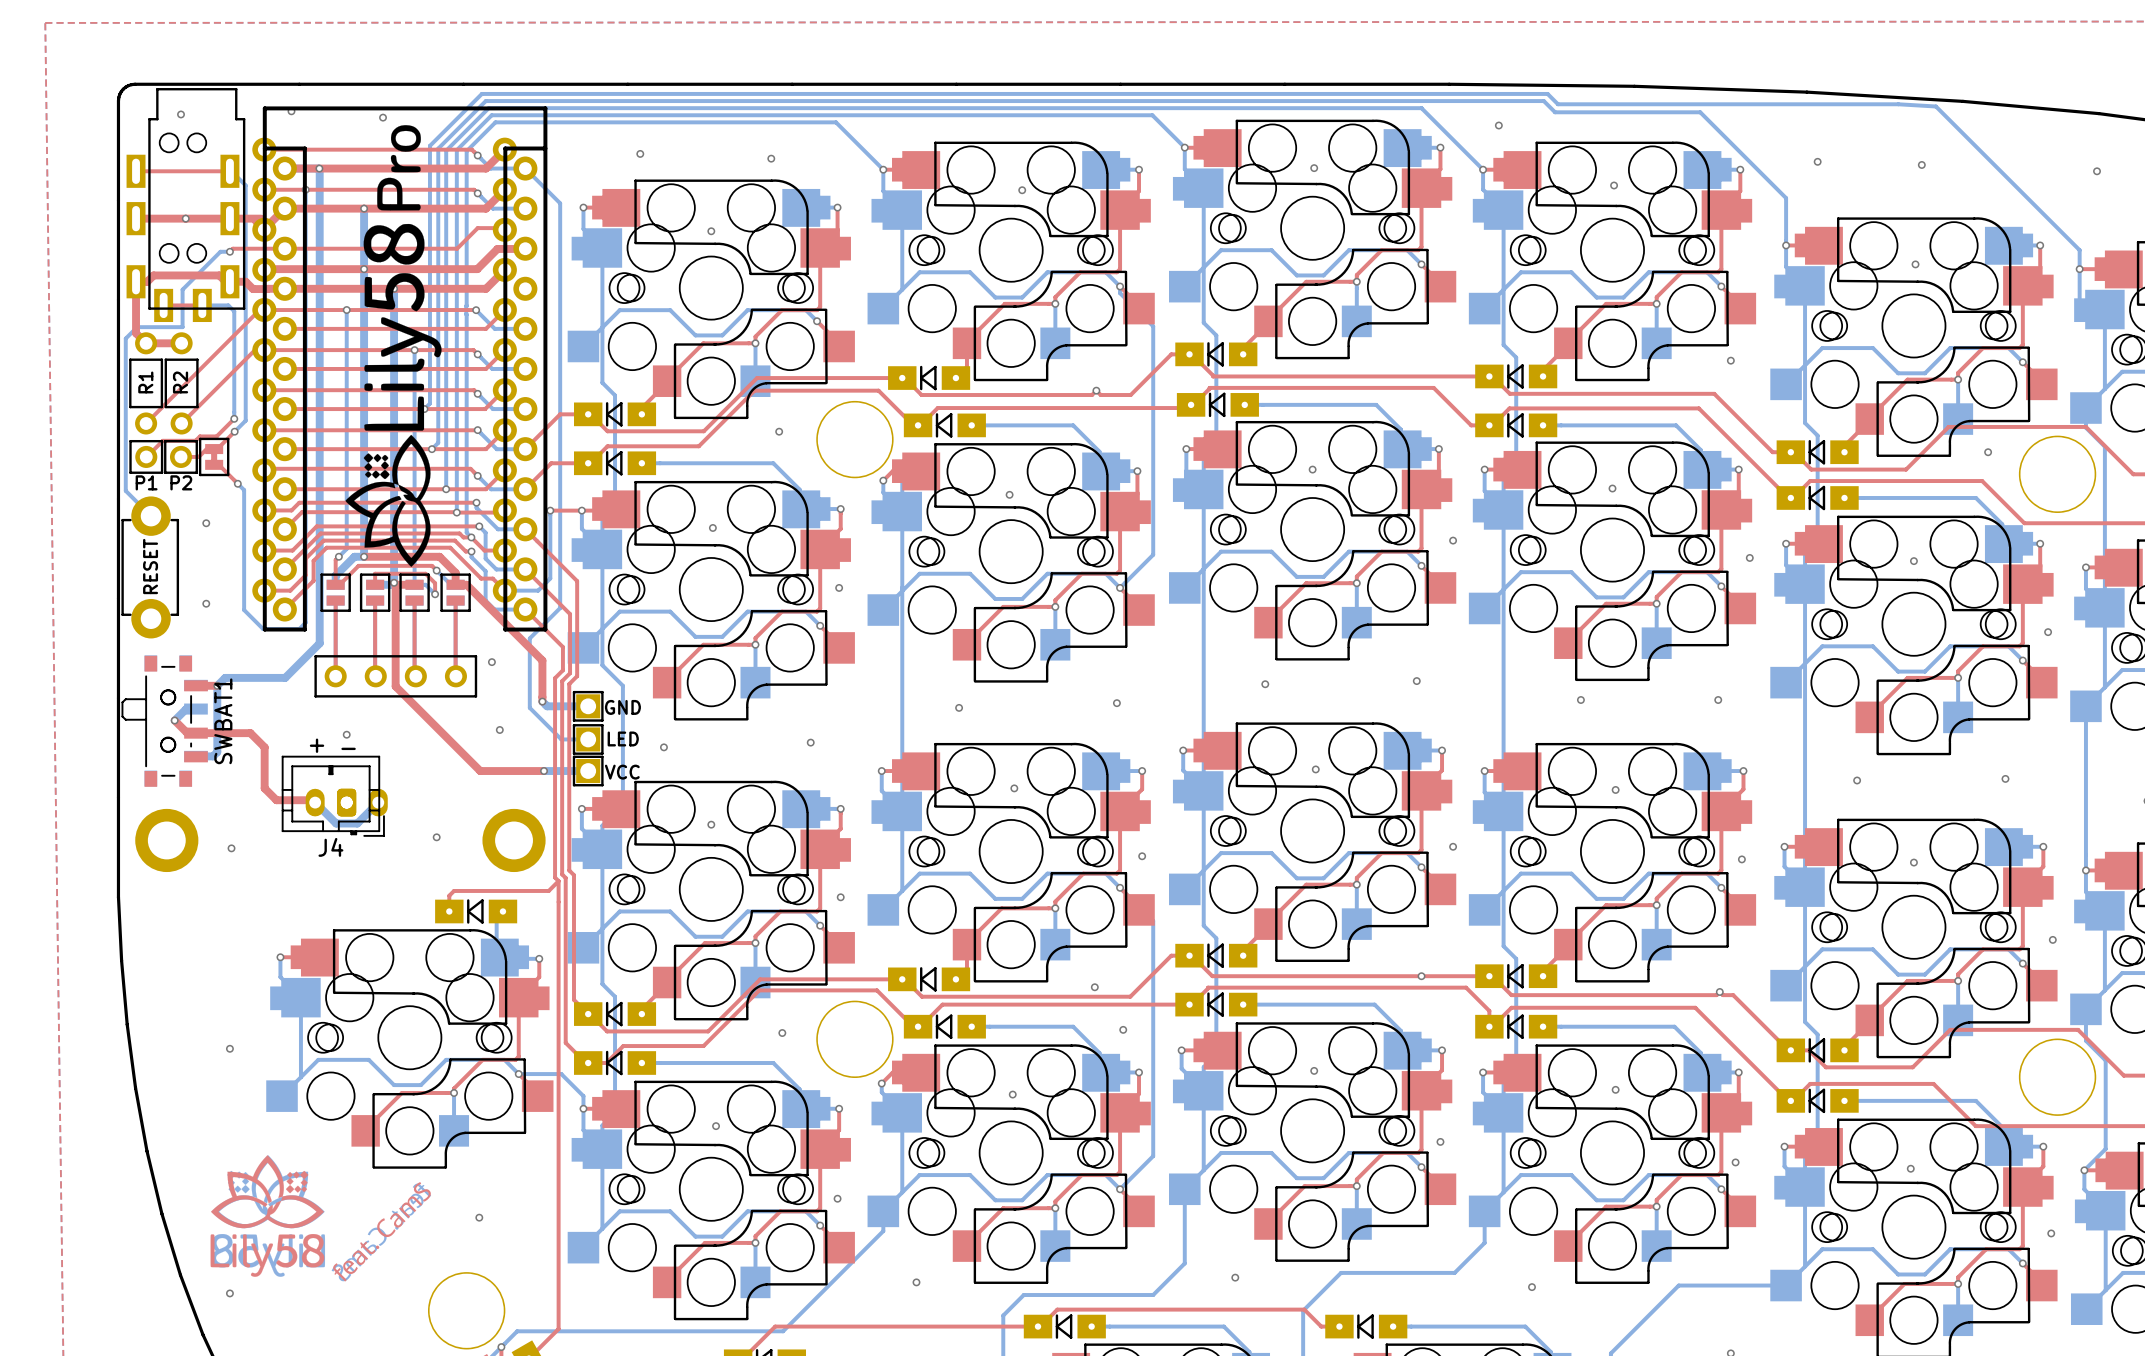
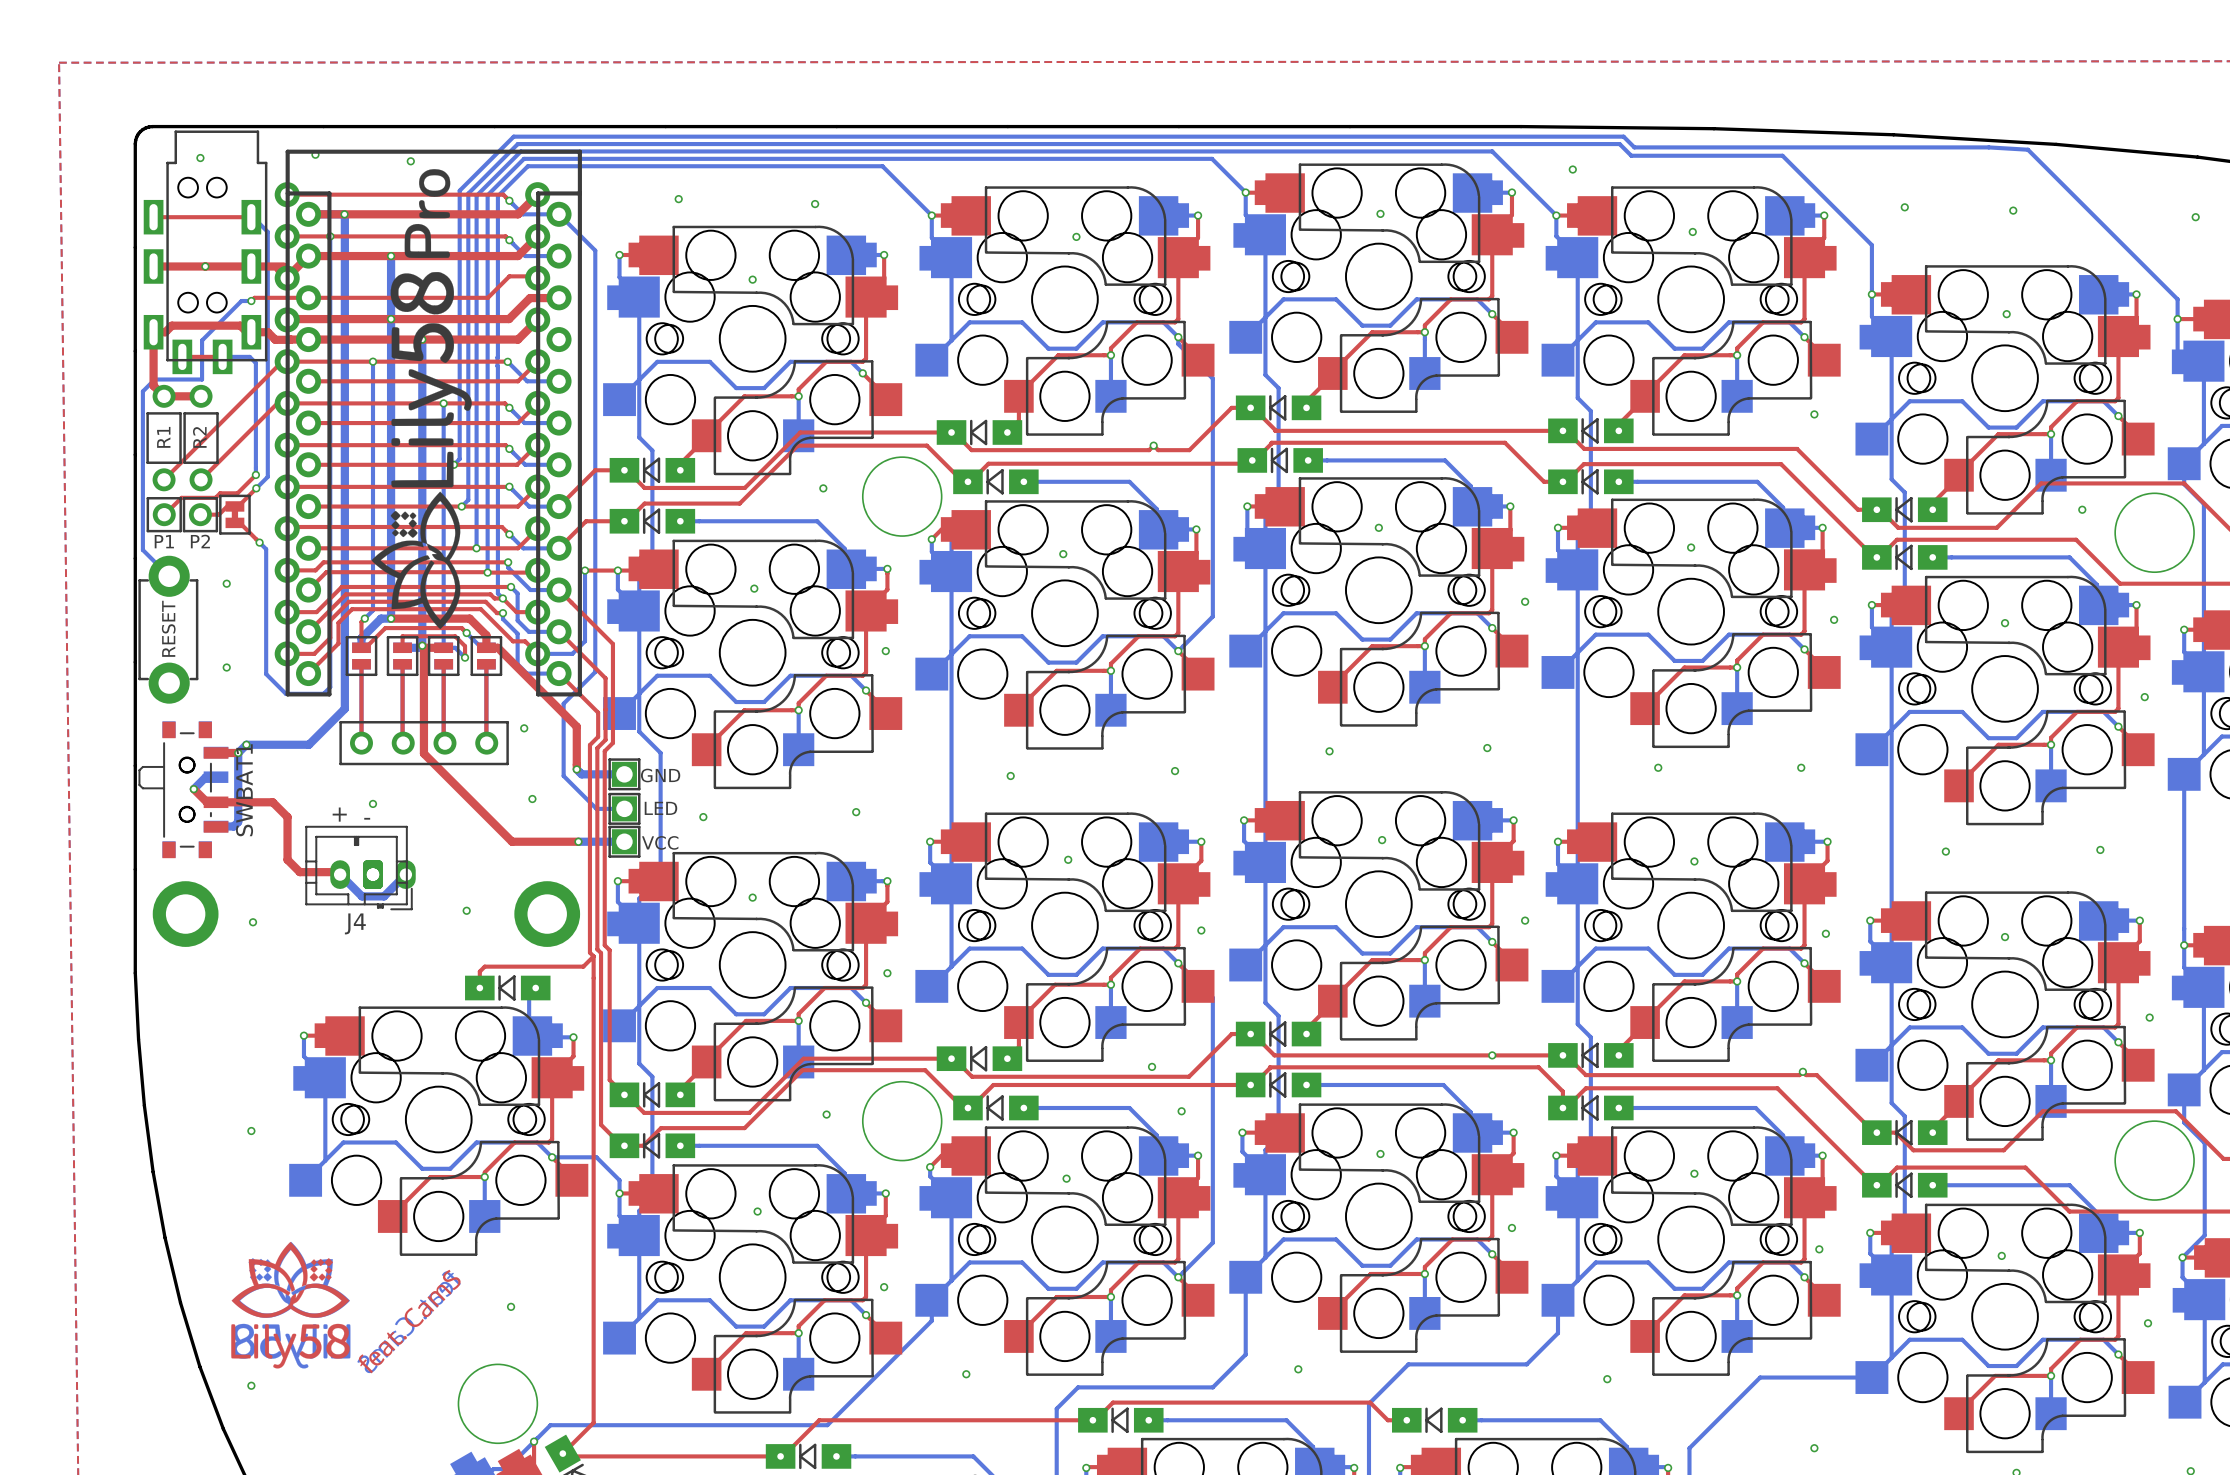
via: none -> (246, 744)

